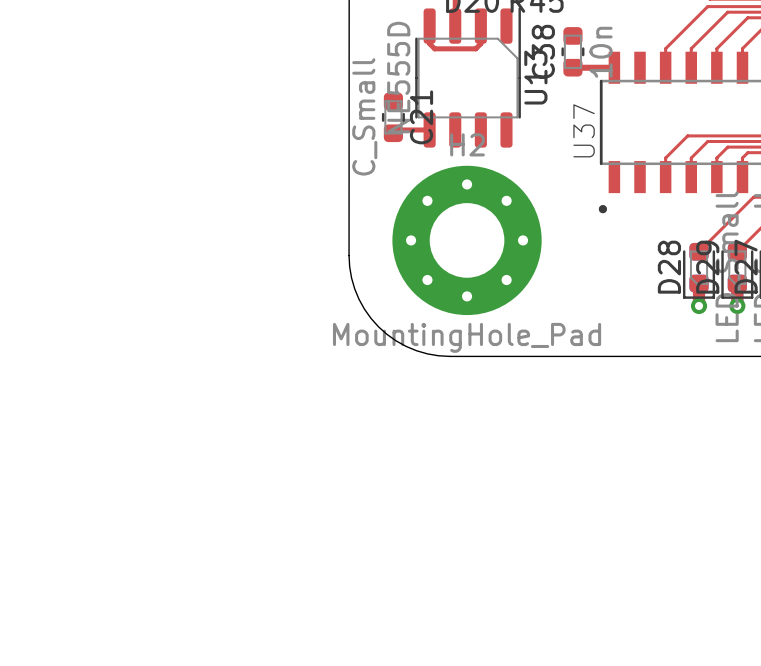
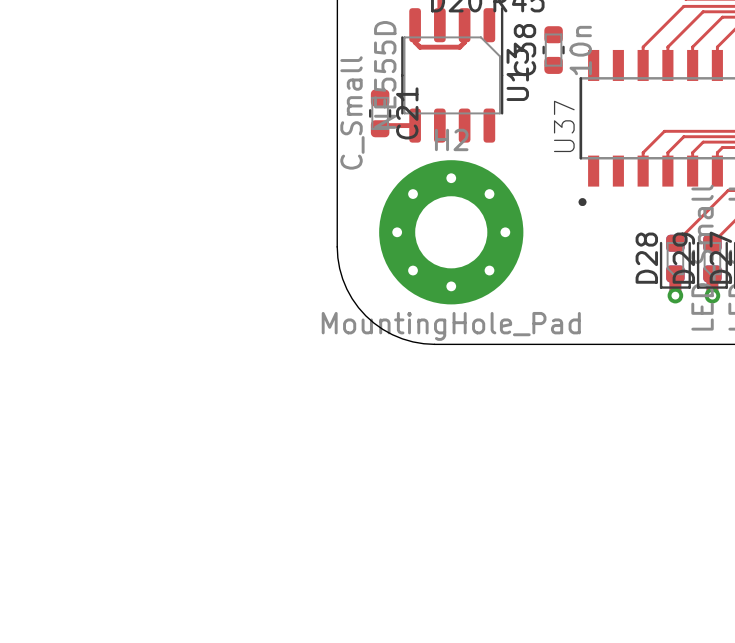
top track: (572, 67) (614, 67) -> none

